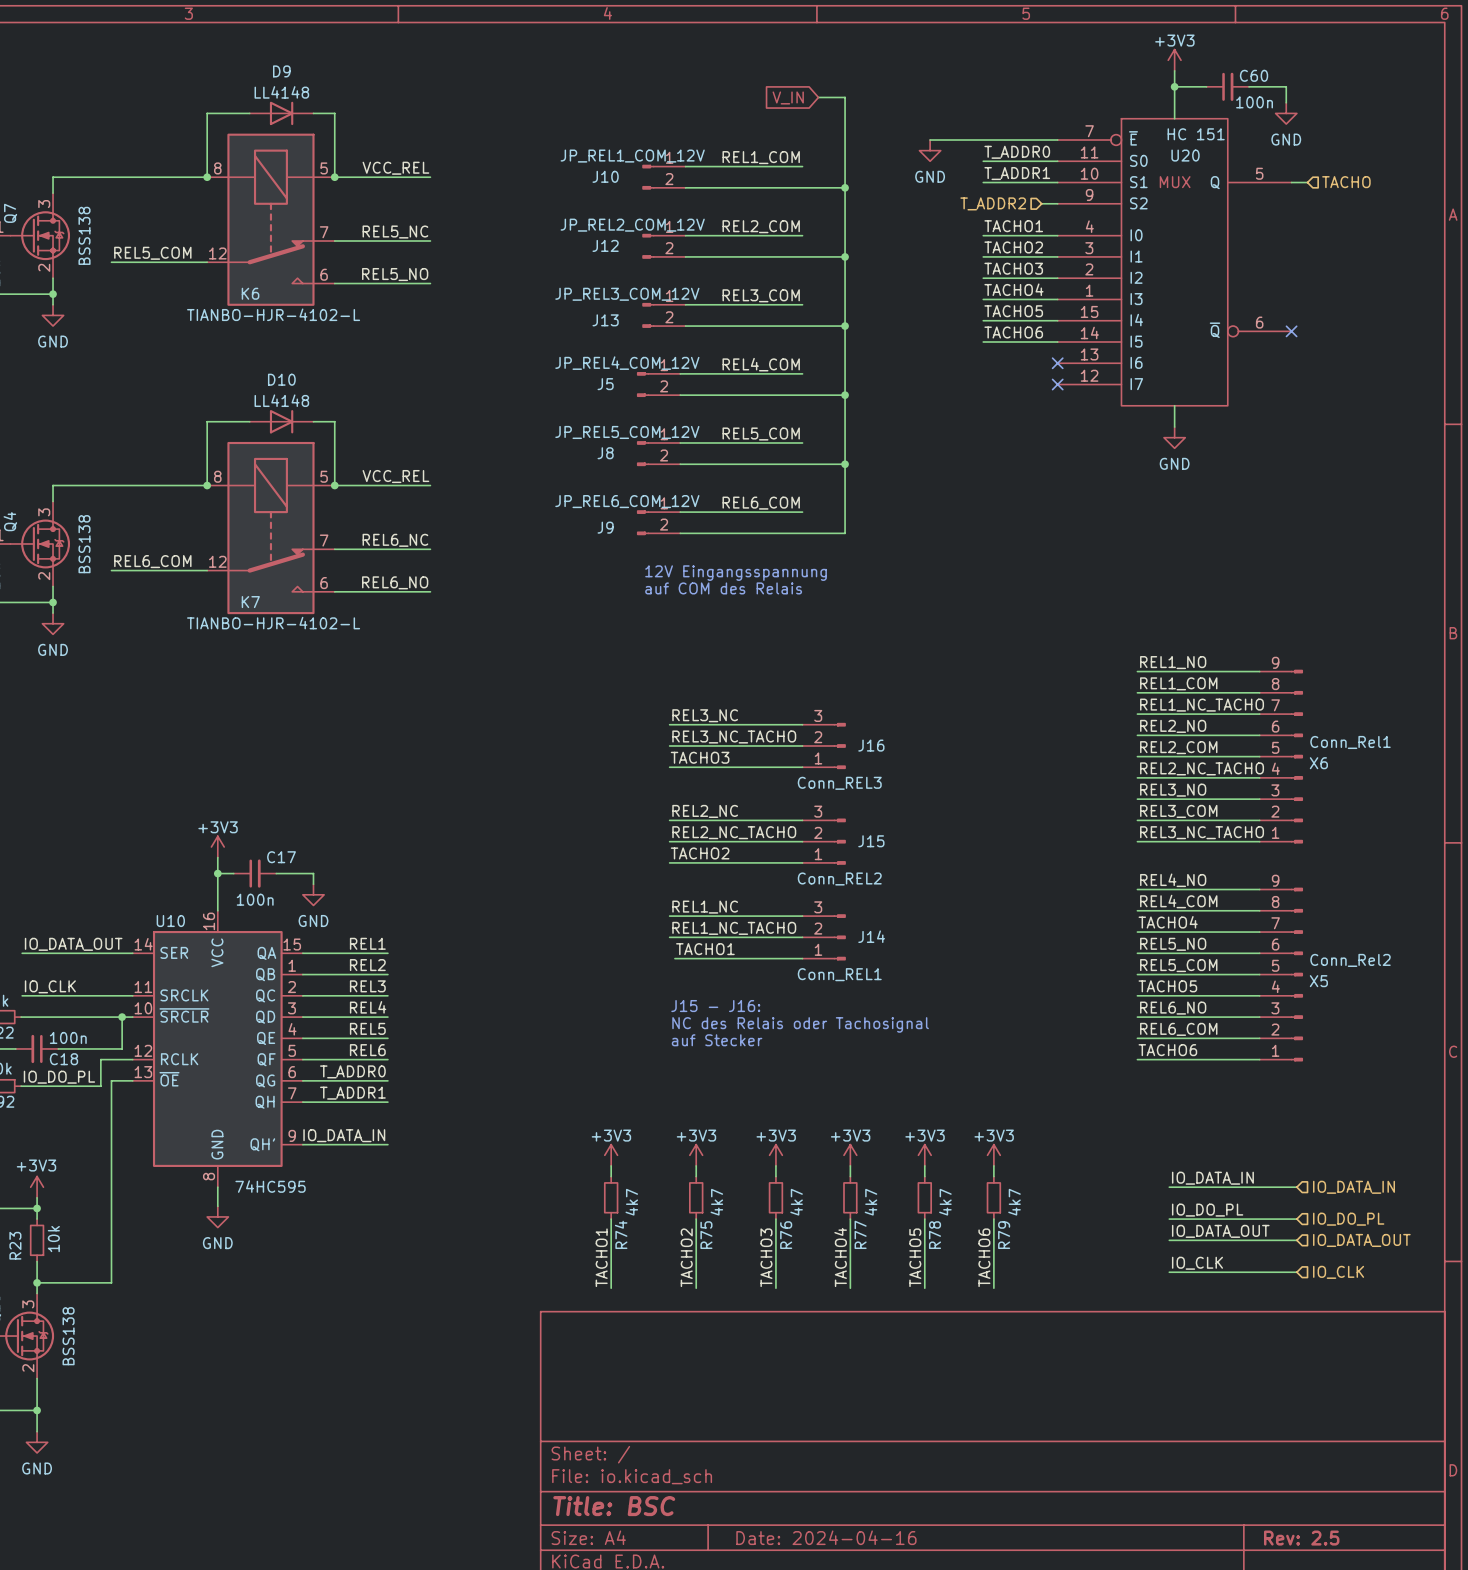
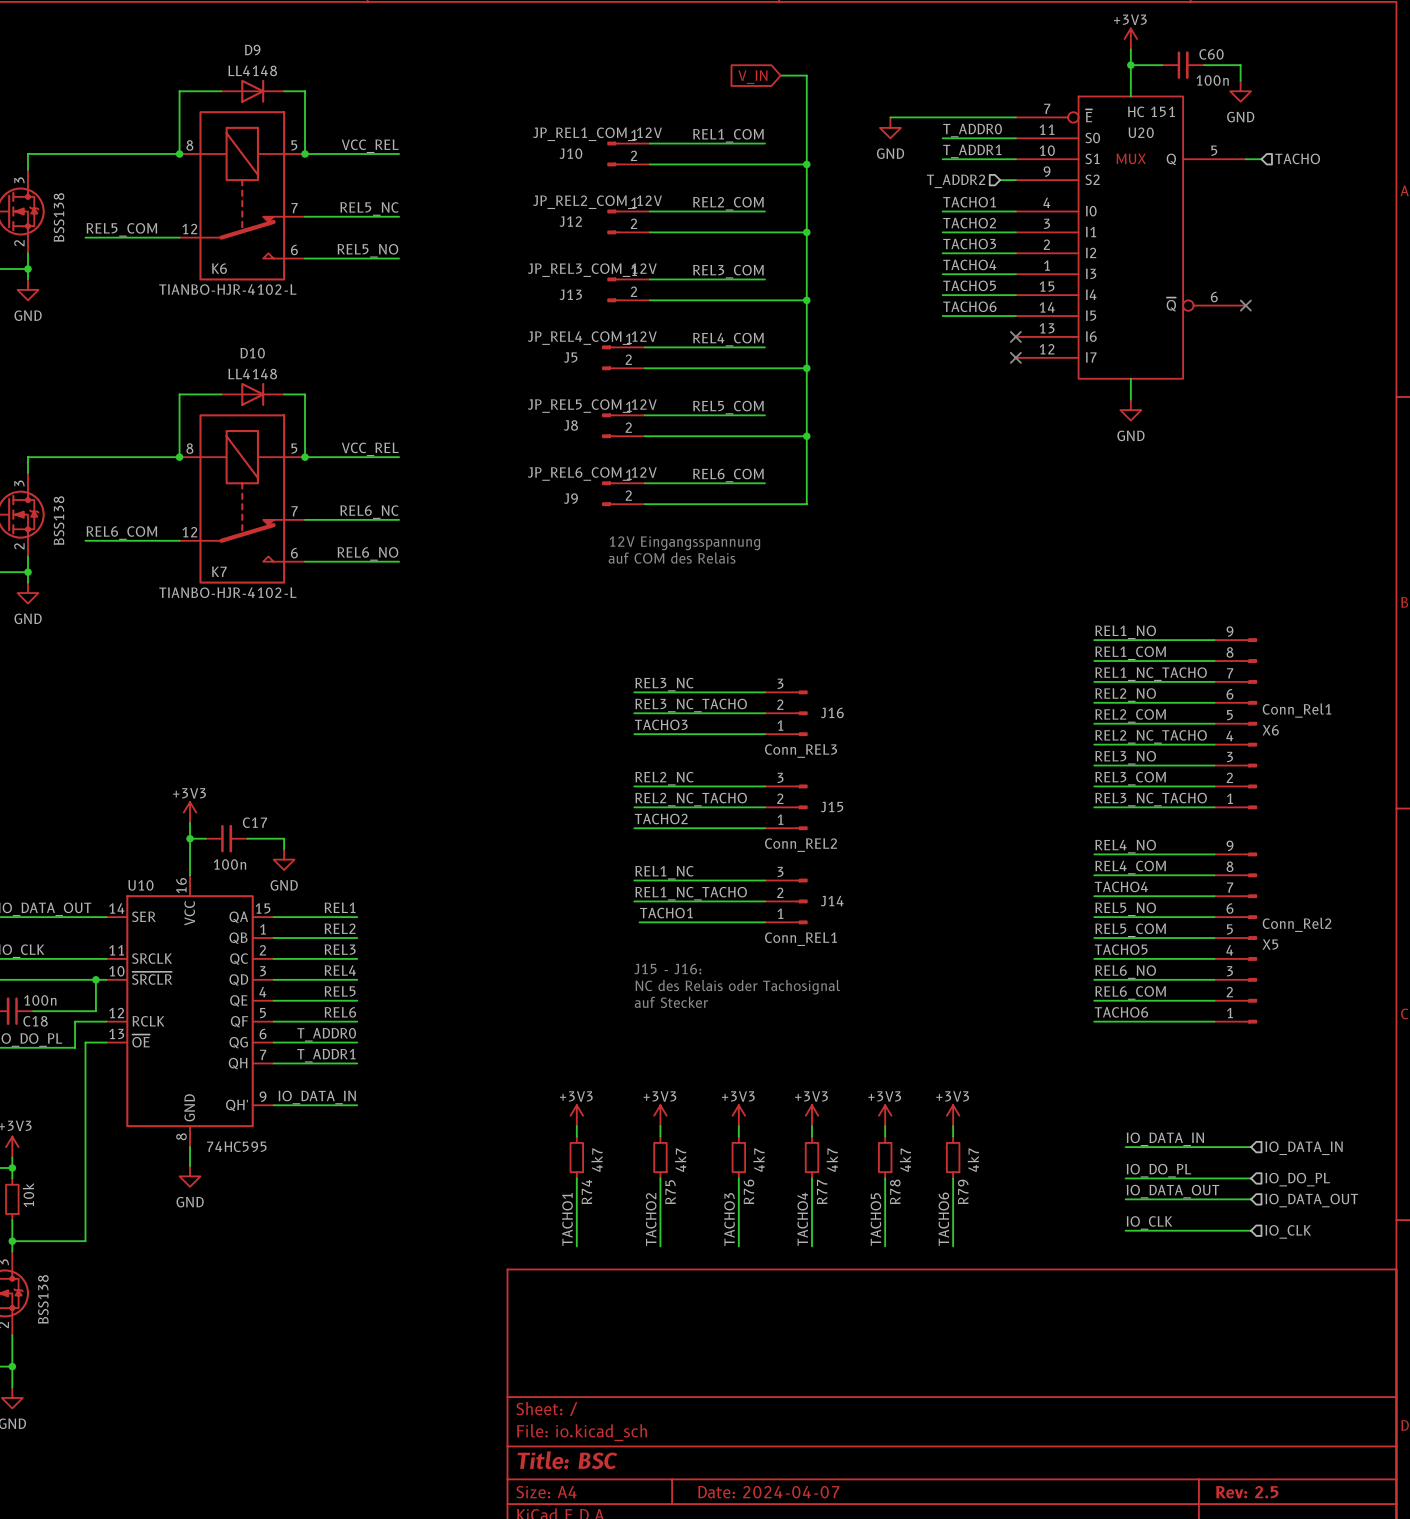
title block: Date: 2024-04-16 (826, 1537) -> Date: 2024-04-07 (768, 1492)

